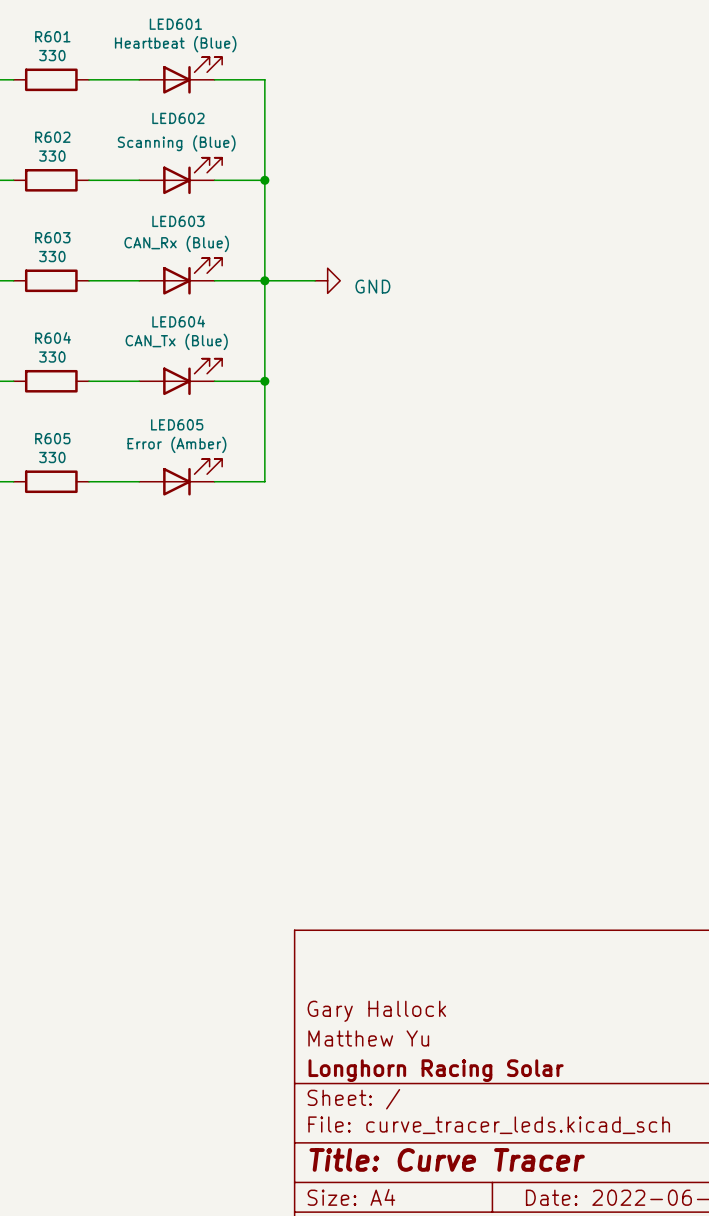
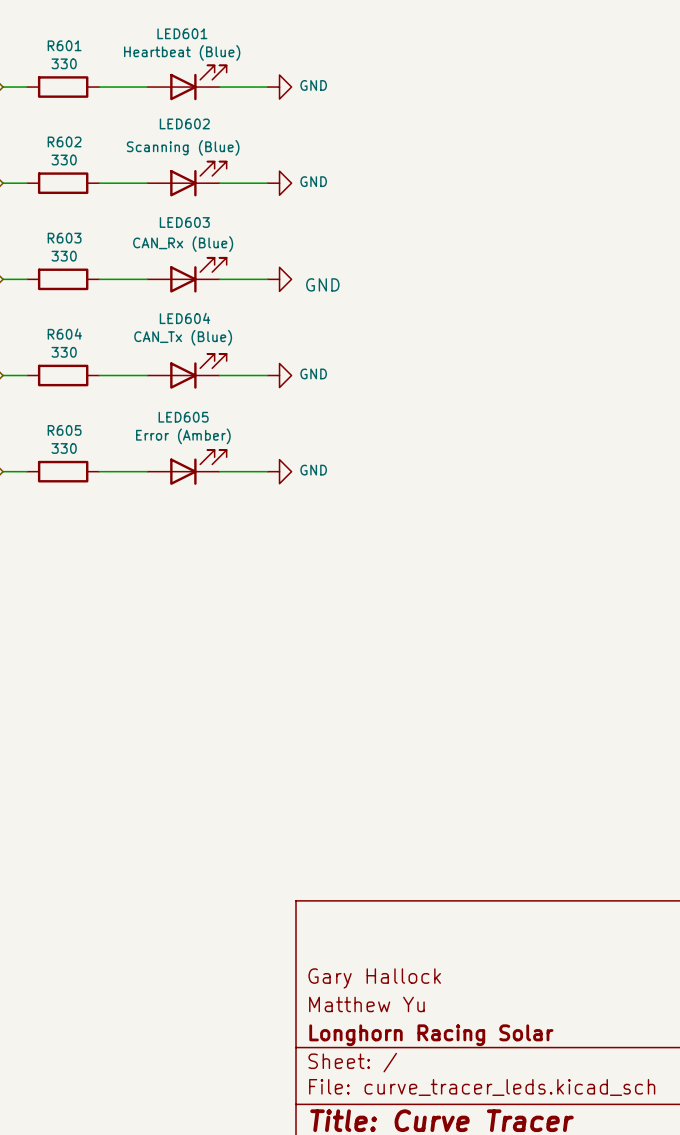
wire: (264, 79) (264, 481) -> none
power symbol: none -> GND (279, 87)
junction: (264, 180) -> none
power symbol: none -> GND (279, 183)
wire: (264, 280) (315, 280) -> none
junction: (264, 280) -> none
power symbol position: GND (327, 280) -> GND (279, 279)
junction: (264, 381) -> none
power symbol: none -> GND (279, 375)
power symbol: none -> GND (279, 471)

